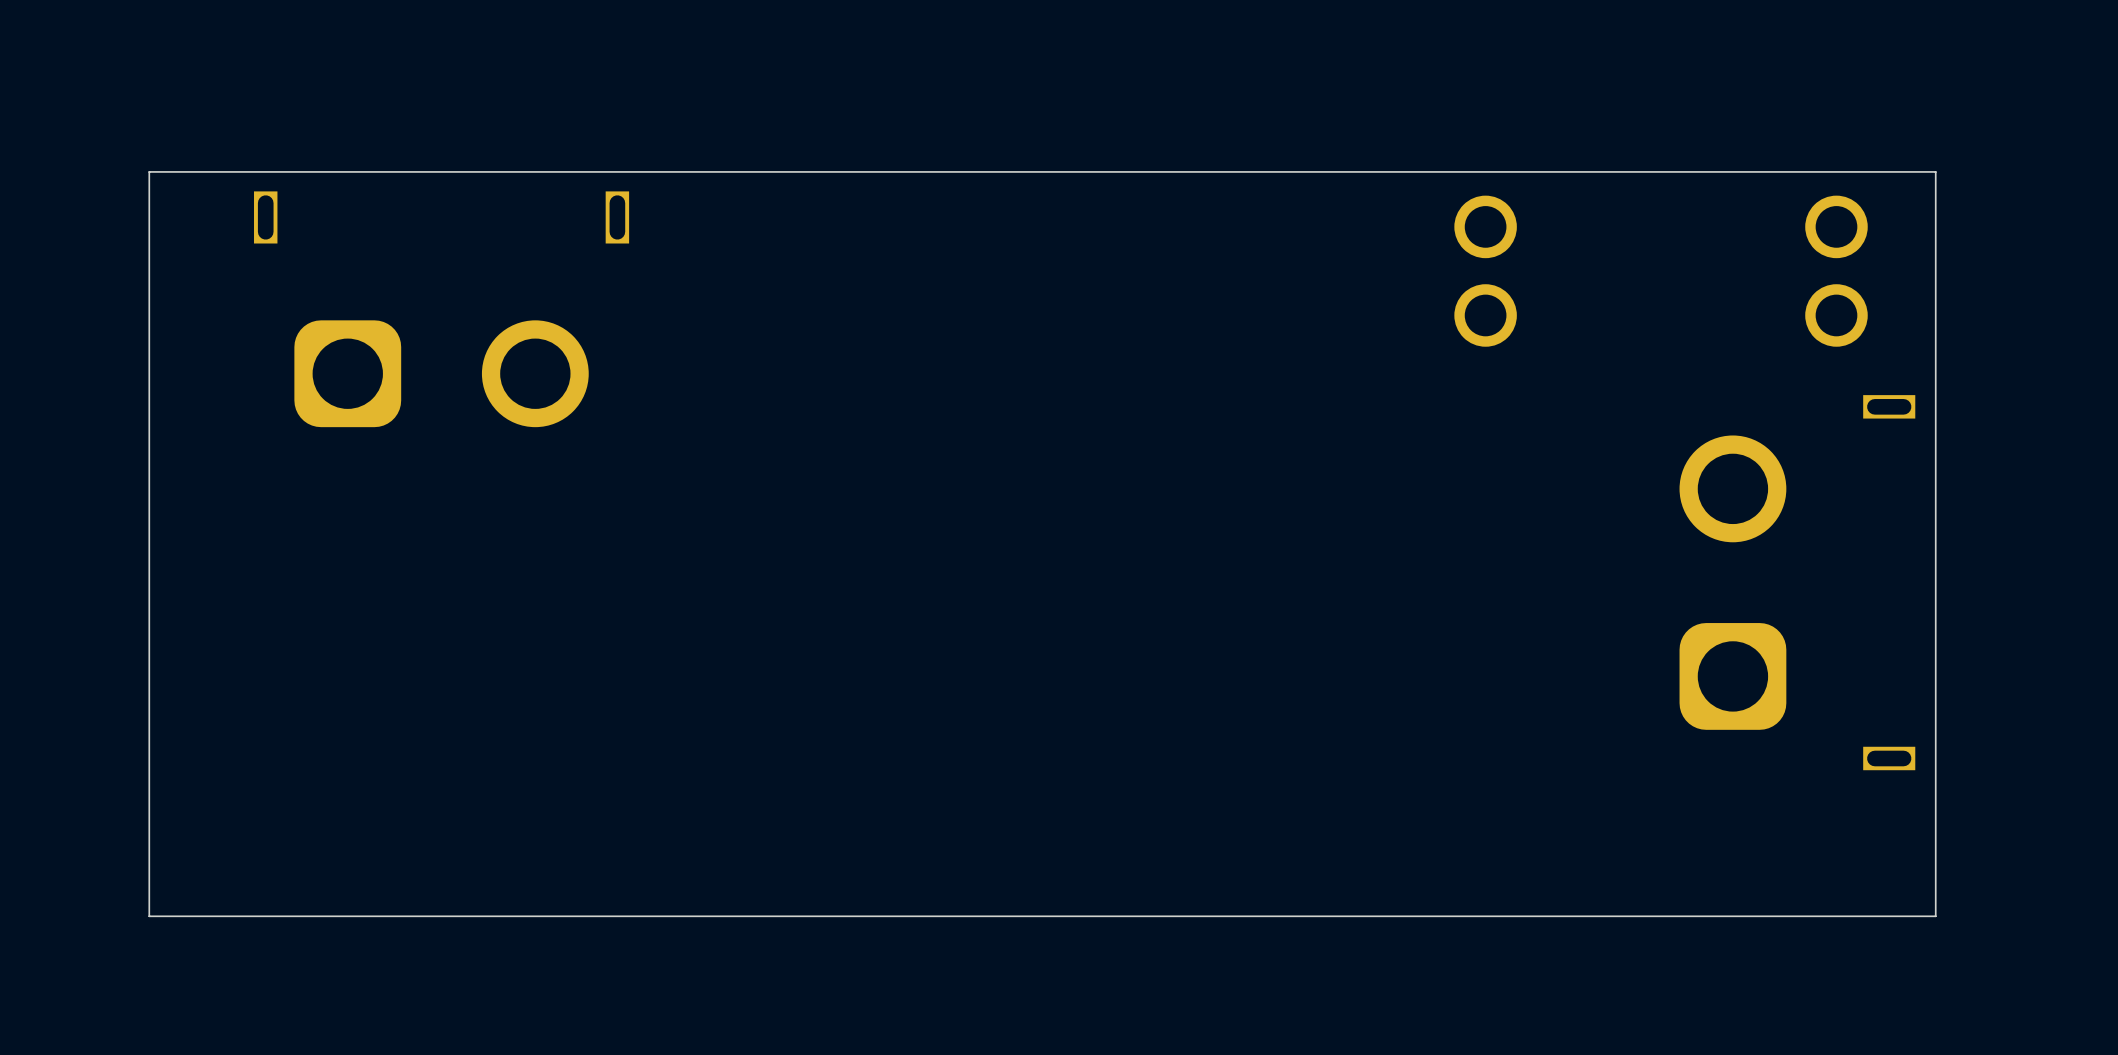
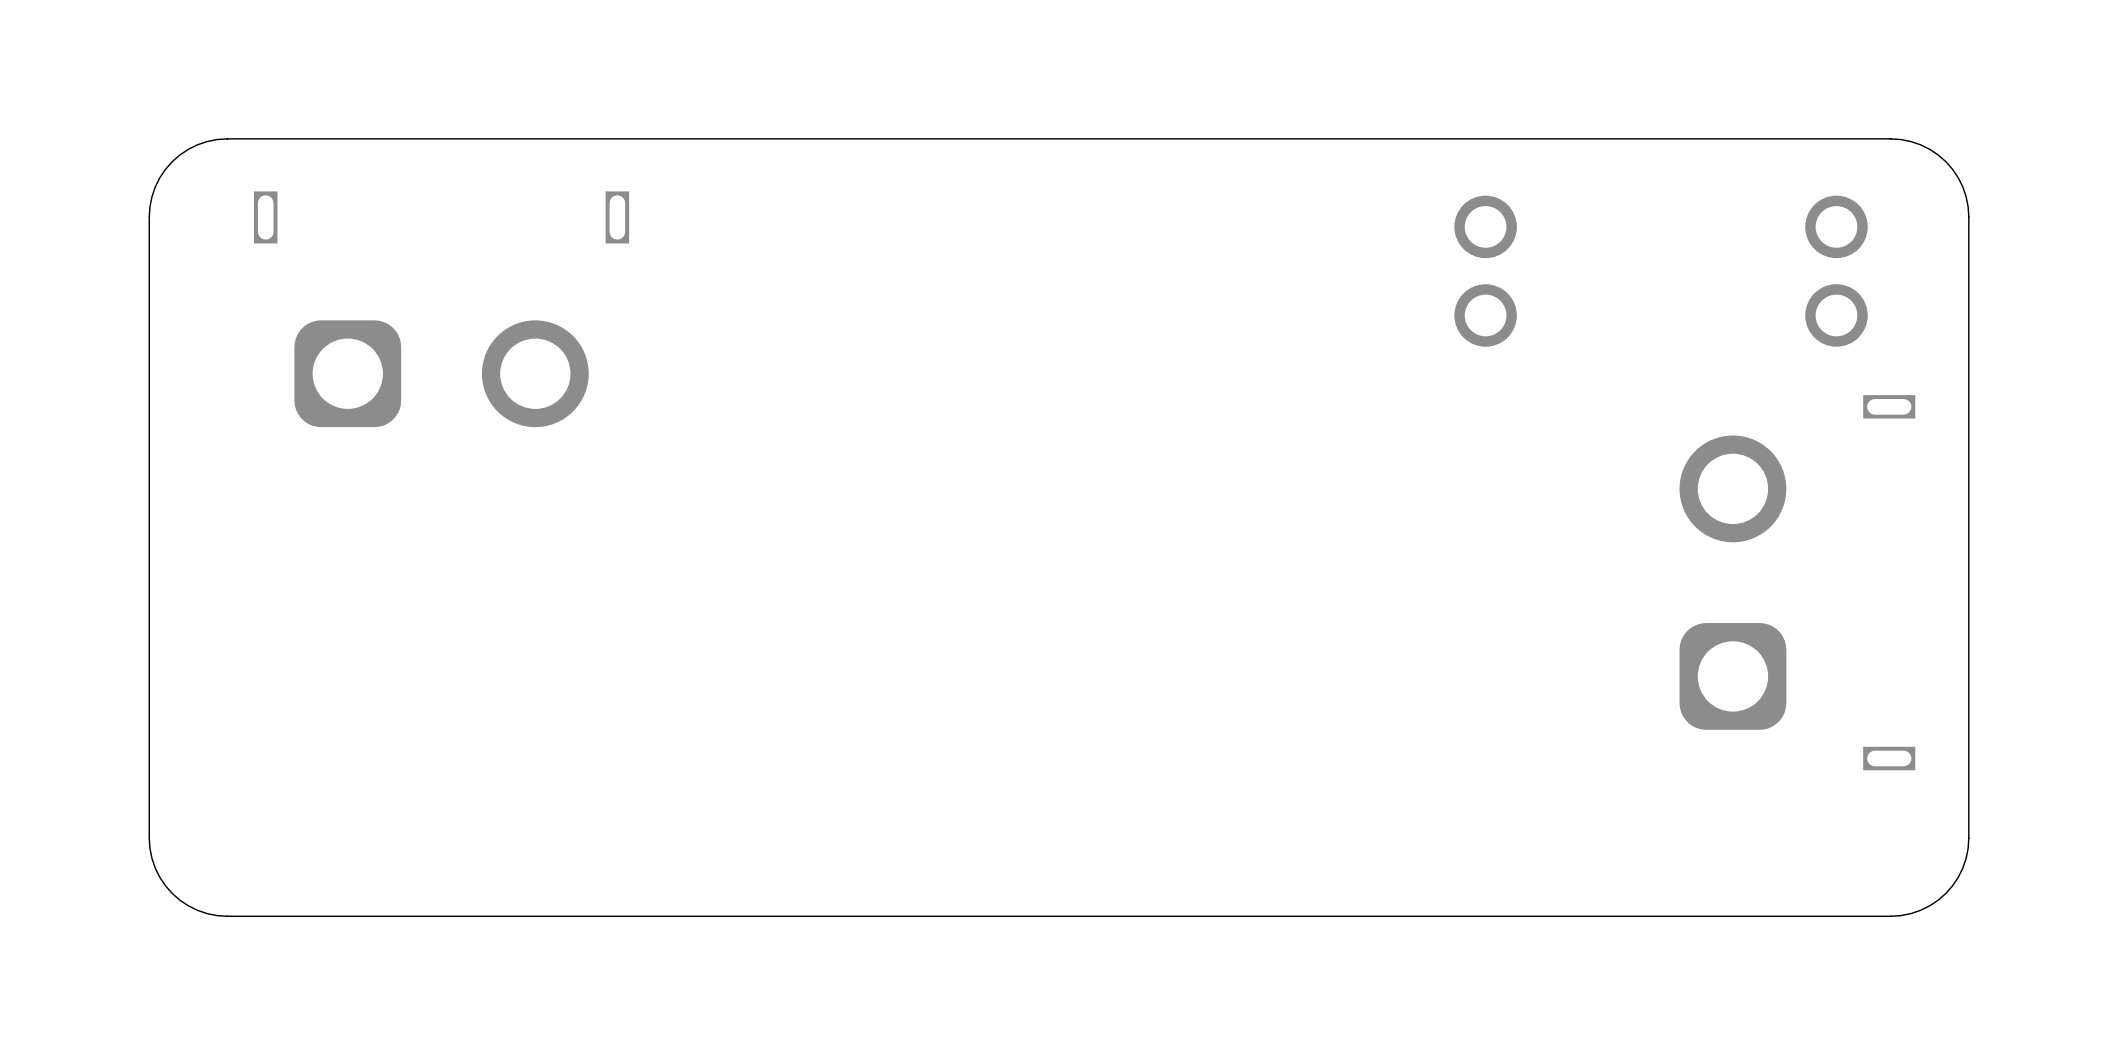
board edge: (149, 217) (149, 171) (1935, 171) (1935, 916) (1890, 916) -> (149, 217) (155, 187) (172, 161) (197, 144) (227, 138) (1890, 138) (1920, 144) (1938, 155) (1952, 169) (1962, 187) (1968, 206) (1968, 838) (1962, 868) (1945, 893) (1920, 910) (1890, 916)
board edge: (149, 838) (149, 916) (227, 916) -> (149, 838) (155, 868) (172, 893) (197, 910) (227, 916)

